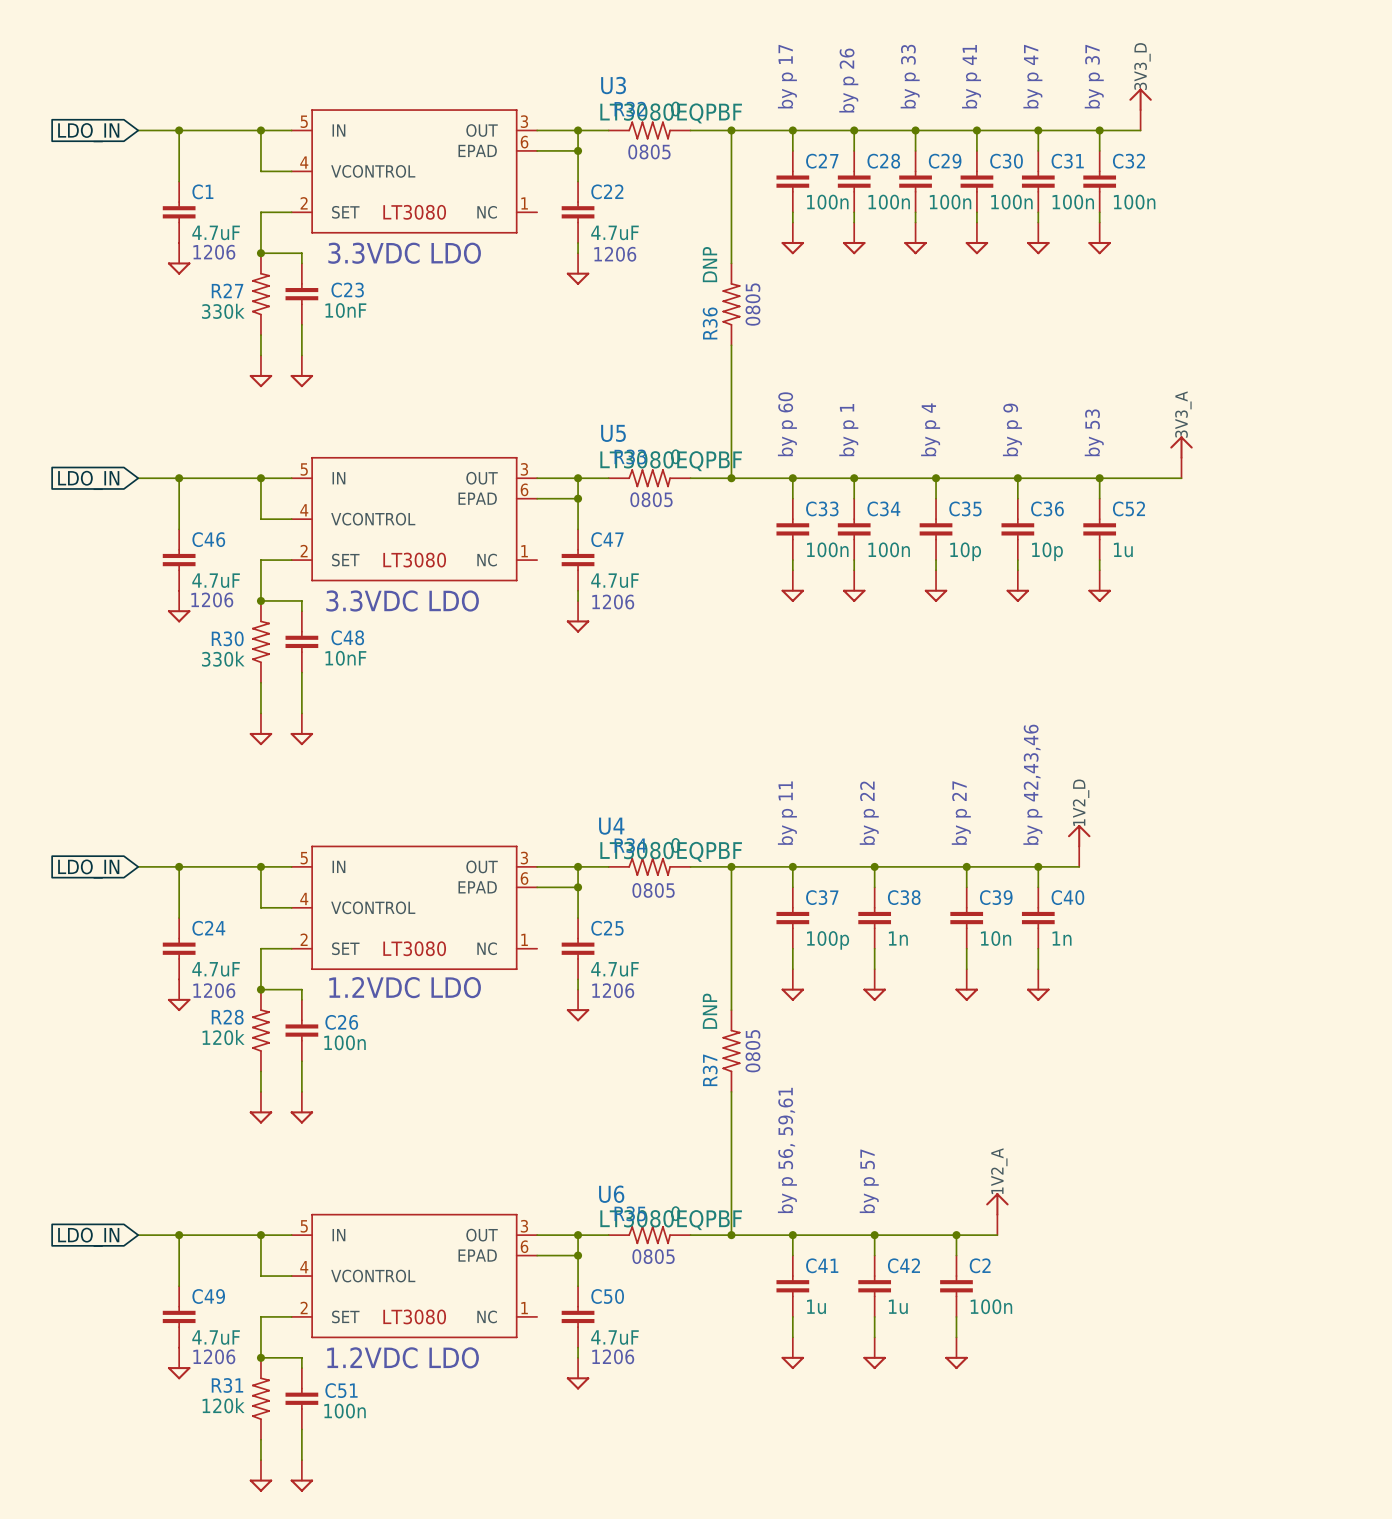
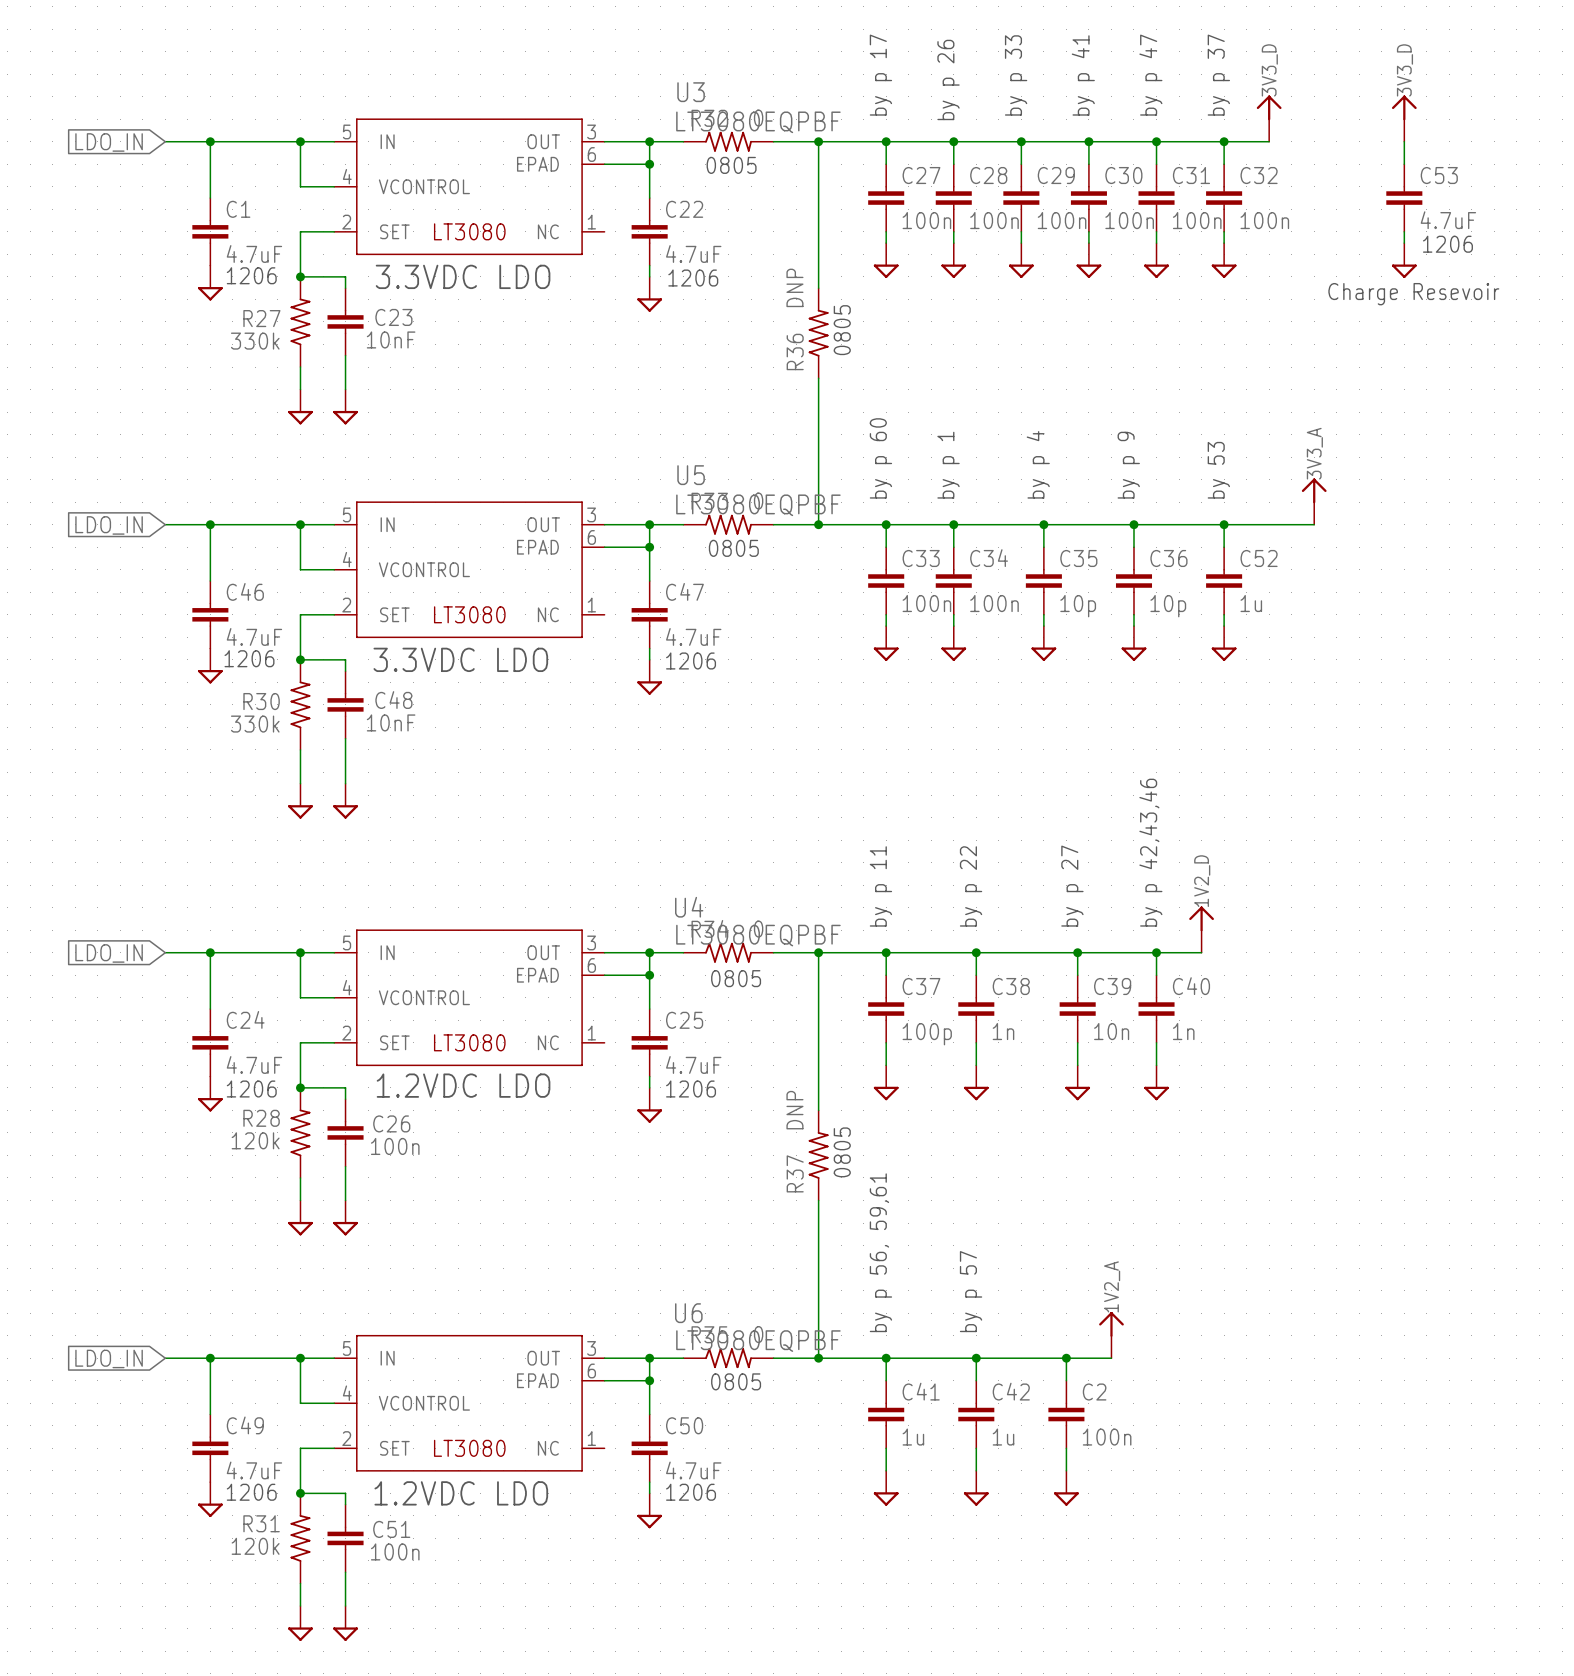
power symbol: none -> (1404, 118)
wire: none -> (1404, 141) (1404, 164)
C53: none -> 4.7uF (1404, 198)
wire: none -> (1404, 231) (1404, 243)
text: none -> 1206 (1447, 244)
power symbol: none -> (1404, 260)
text: none -> Charge Resevoir (1413, 294)

